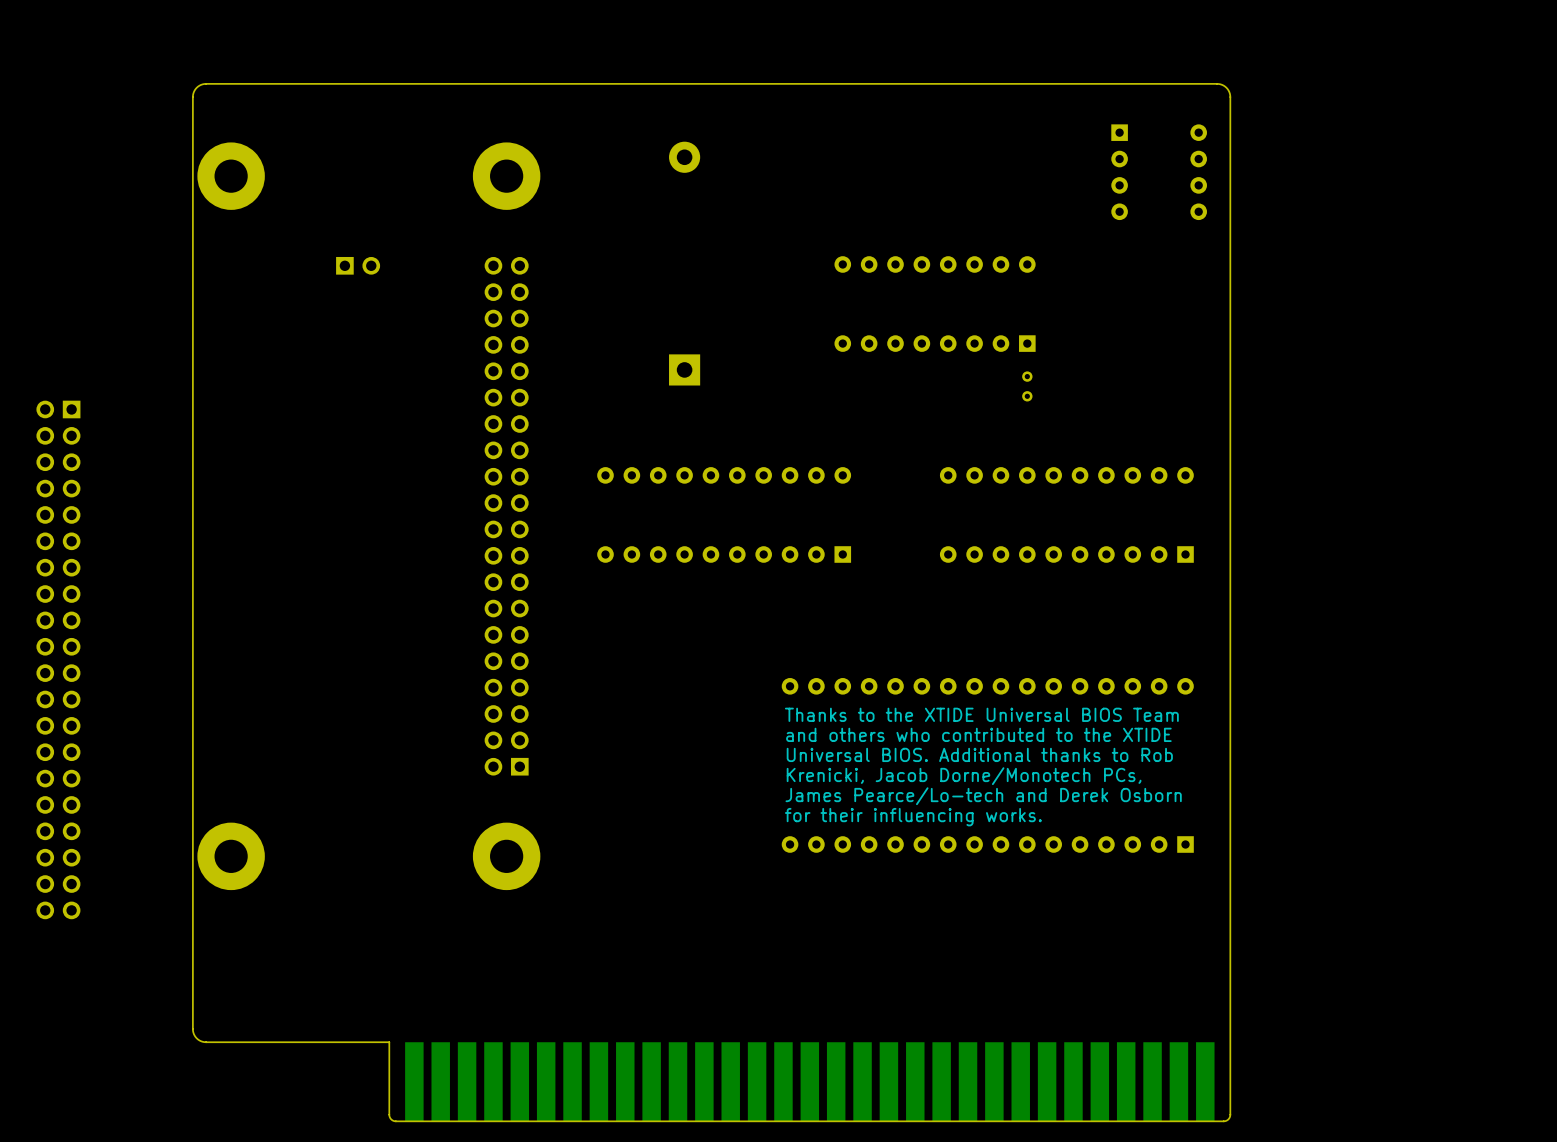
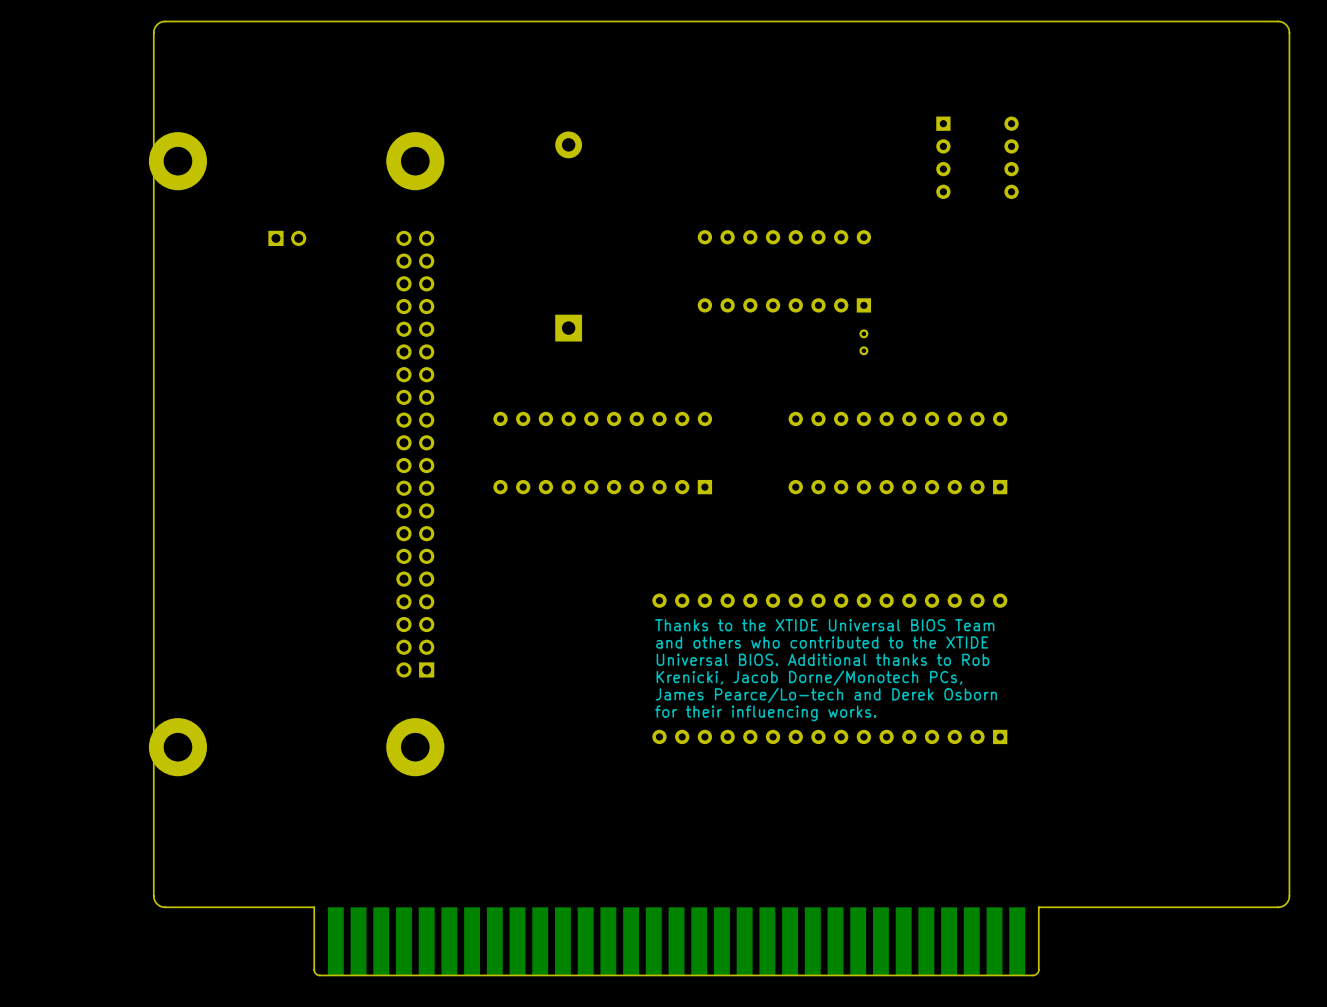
part: (58, 659) -> none
board edge: (1230, 1042) (1230, 97) (1226, 87) (1217, 83) (206, 83) (196, 87) (192, 97) (192, 1029) (194, 1035) (199, 1040) (216, 1042) -> (1038, 907) (1278, 907) (1285, 904) (1289, 898) (1289, 32) (1287, 25) (1281, 21) (165, 21) (158, 23) (153, 32) (153, 895) (157, 903) (165, 907)

